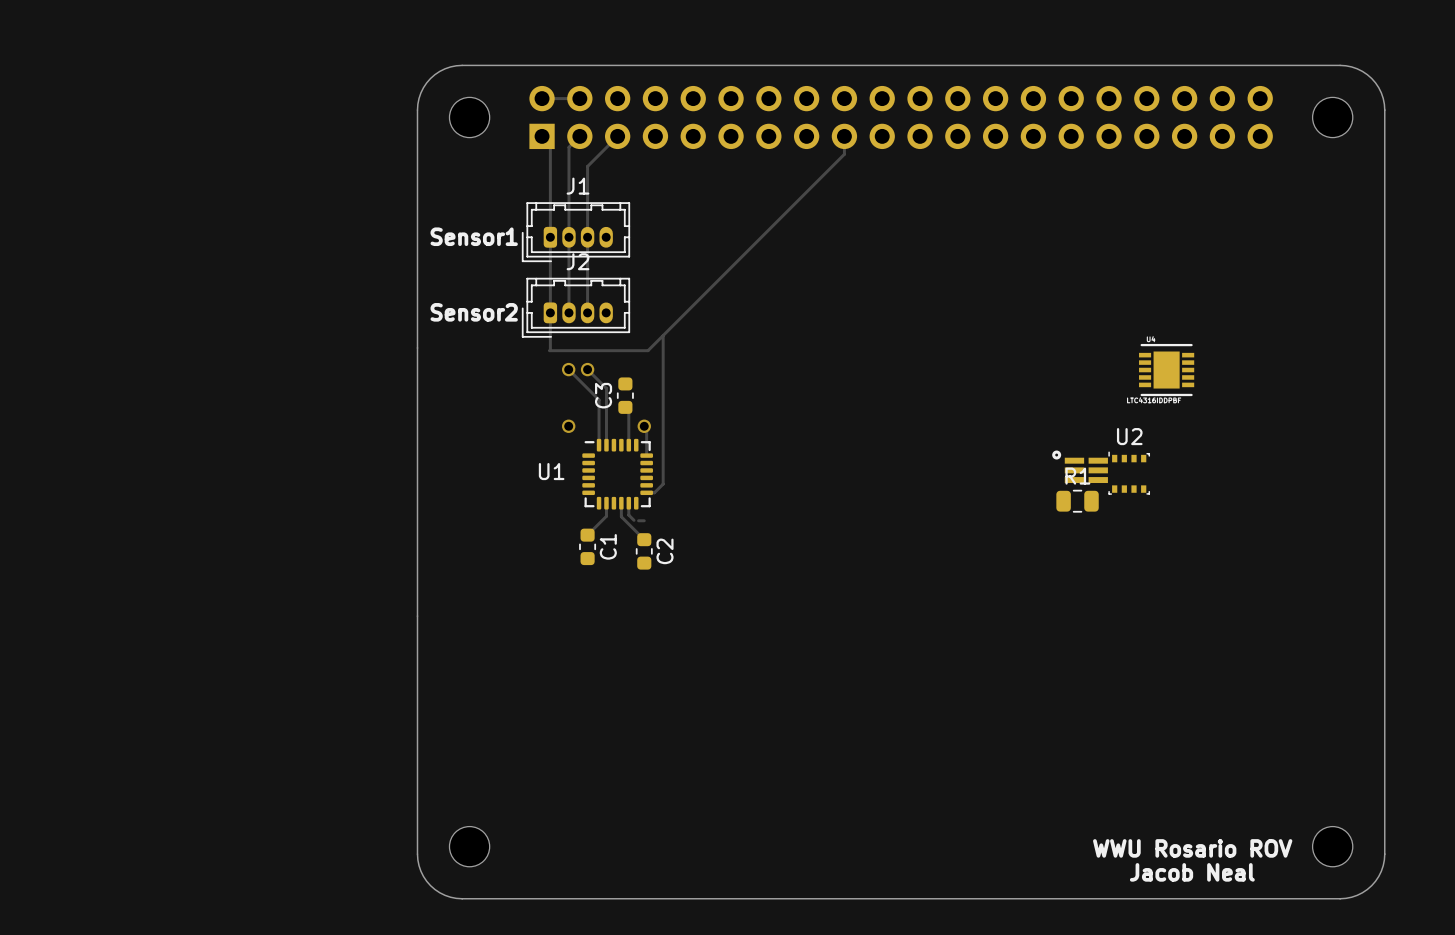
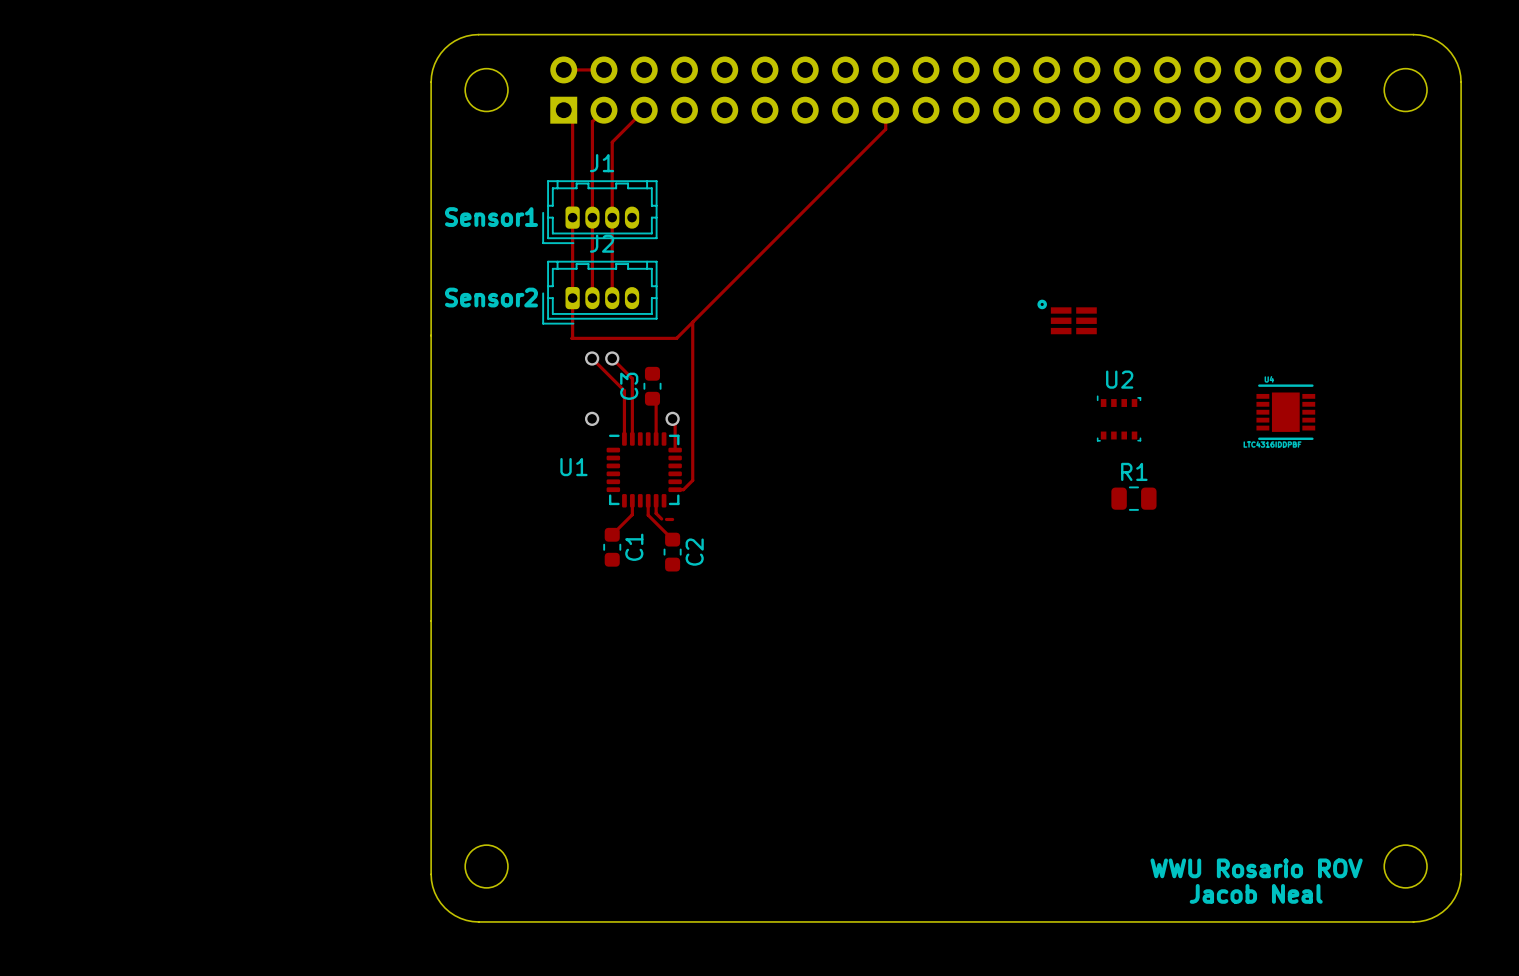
part position: (1166, 370) -> (1285, 412)
part position: (1080, 466) -> (1067, 316)
U2 position: (1129, 473) -> (1119, 418)

